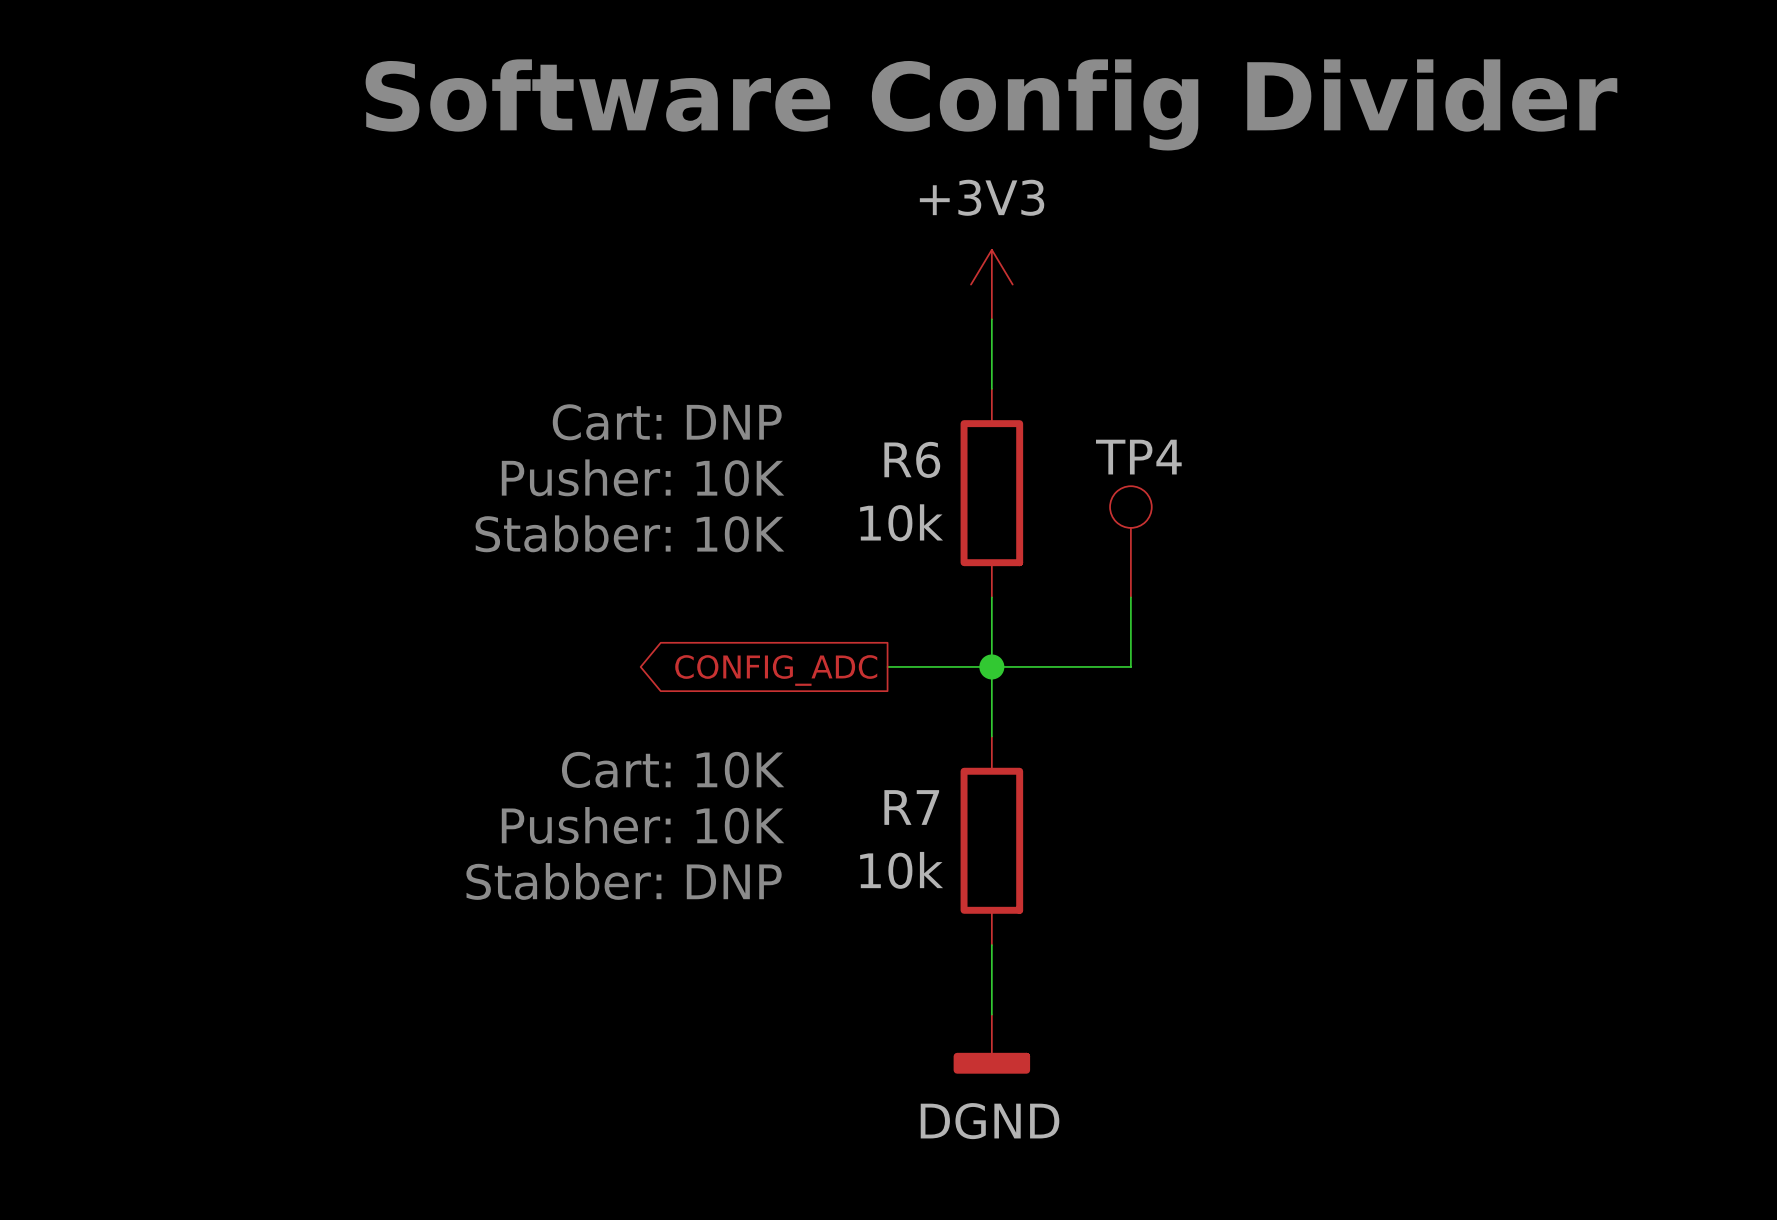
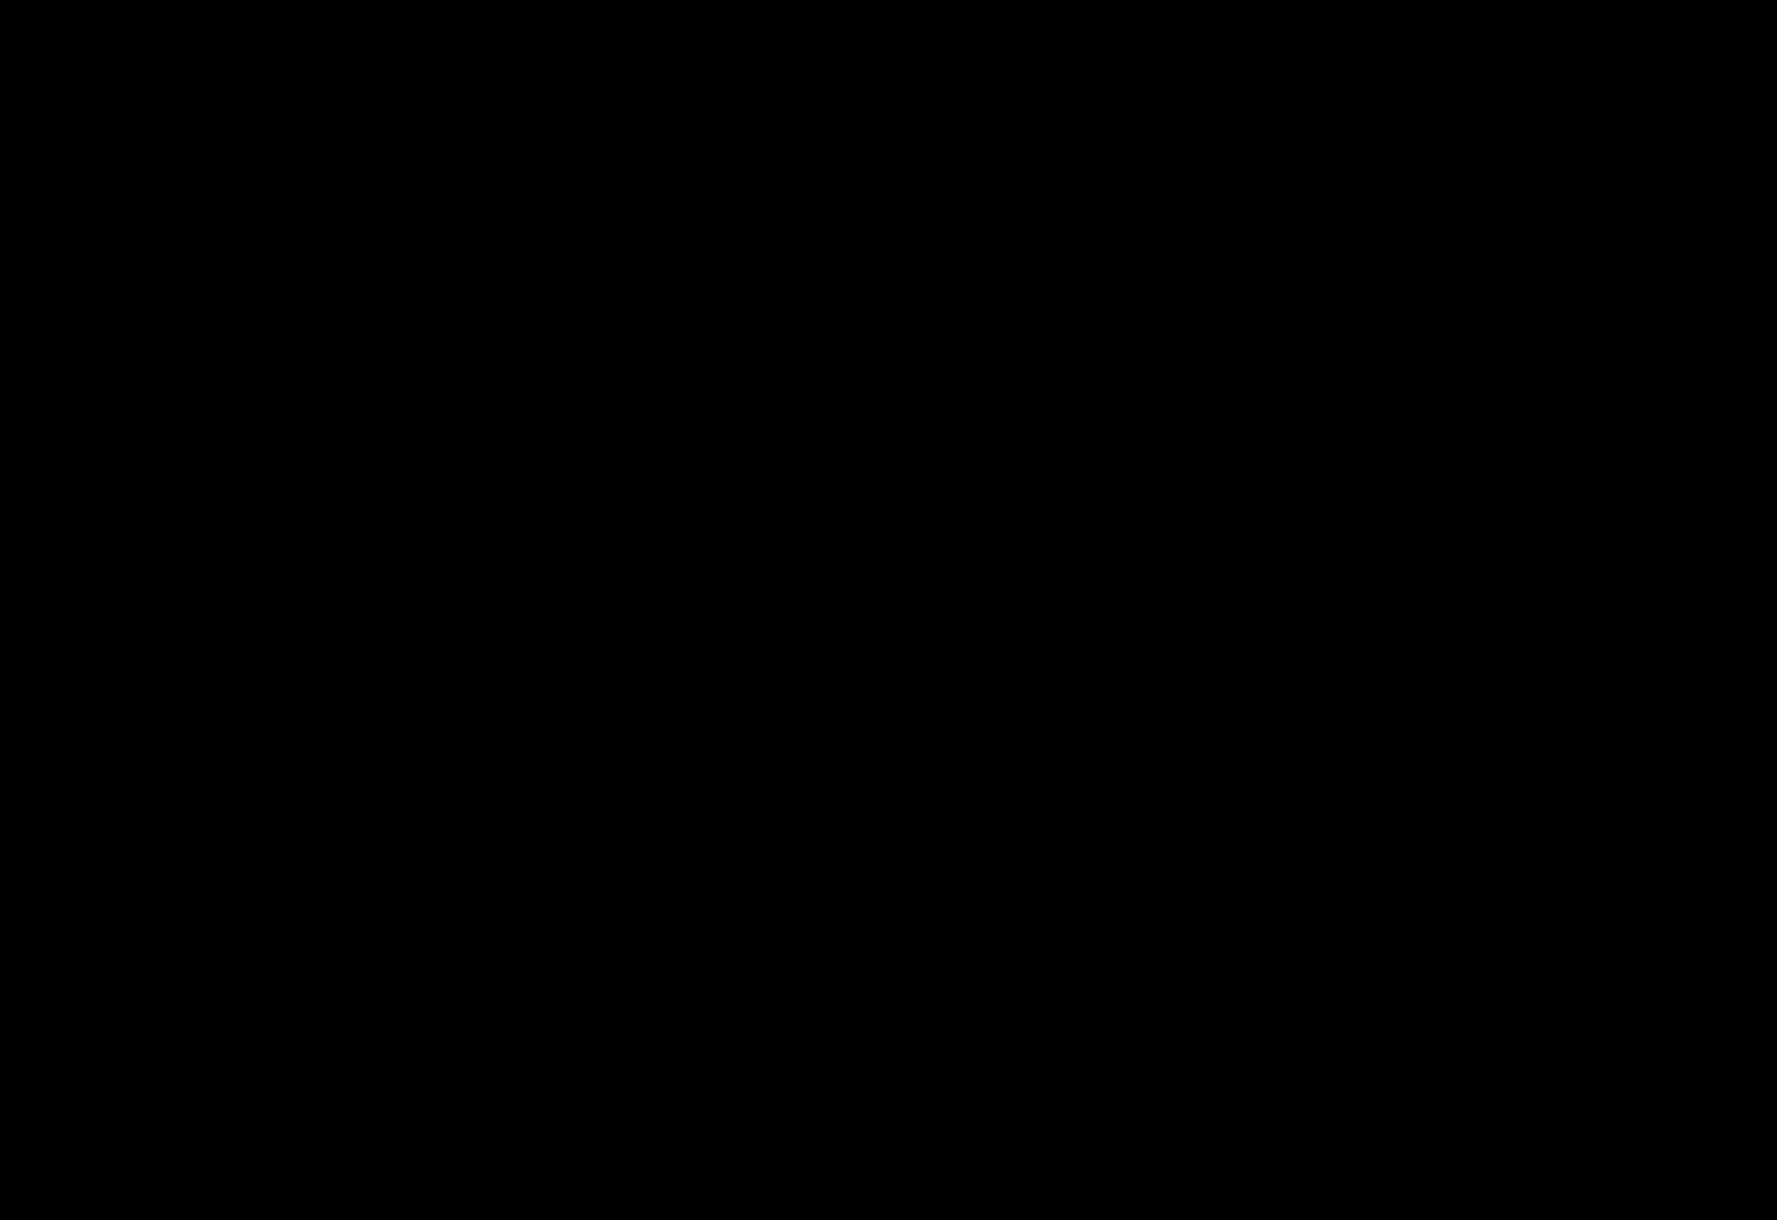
text: Software Config Divider (991, 104) -> none
power symbol: +3V3 (991, 284) -> none
wire: (991, 319) (991, 388) -> none
text: Cart: DNP (667, 422) -> none
text: Pusher: 10K (643, 477) -> none
R6: 10k (991, 493) -> none
text: Stabber: 10K (629, 533) -> none
TP4: (1130, 541) -> none
wire: (991, 597) (991, 736) -> none
wire: (1130, 597) (1130, 666) (887, 666) -> none
junction: (991, 666) -> none
global label: CONFIG_ADC (776, 670) -> none
text: Cart: 10K (673, 769) -> none
text: Pusher: 10K (643, 825) -> none
R7: 10k (991, 840) -> none
text: Stabber: DNP (624, 881) -> none
wire: (991, 945) (991, 1014) -> none
power symbol: DGND (991, 1044) -> none

